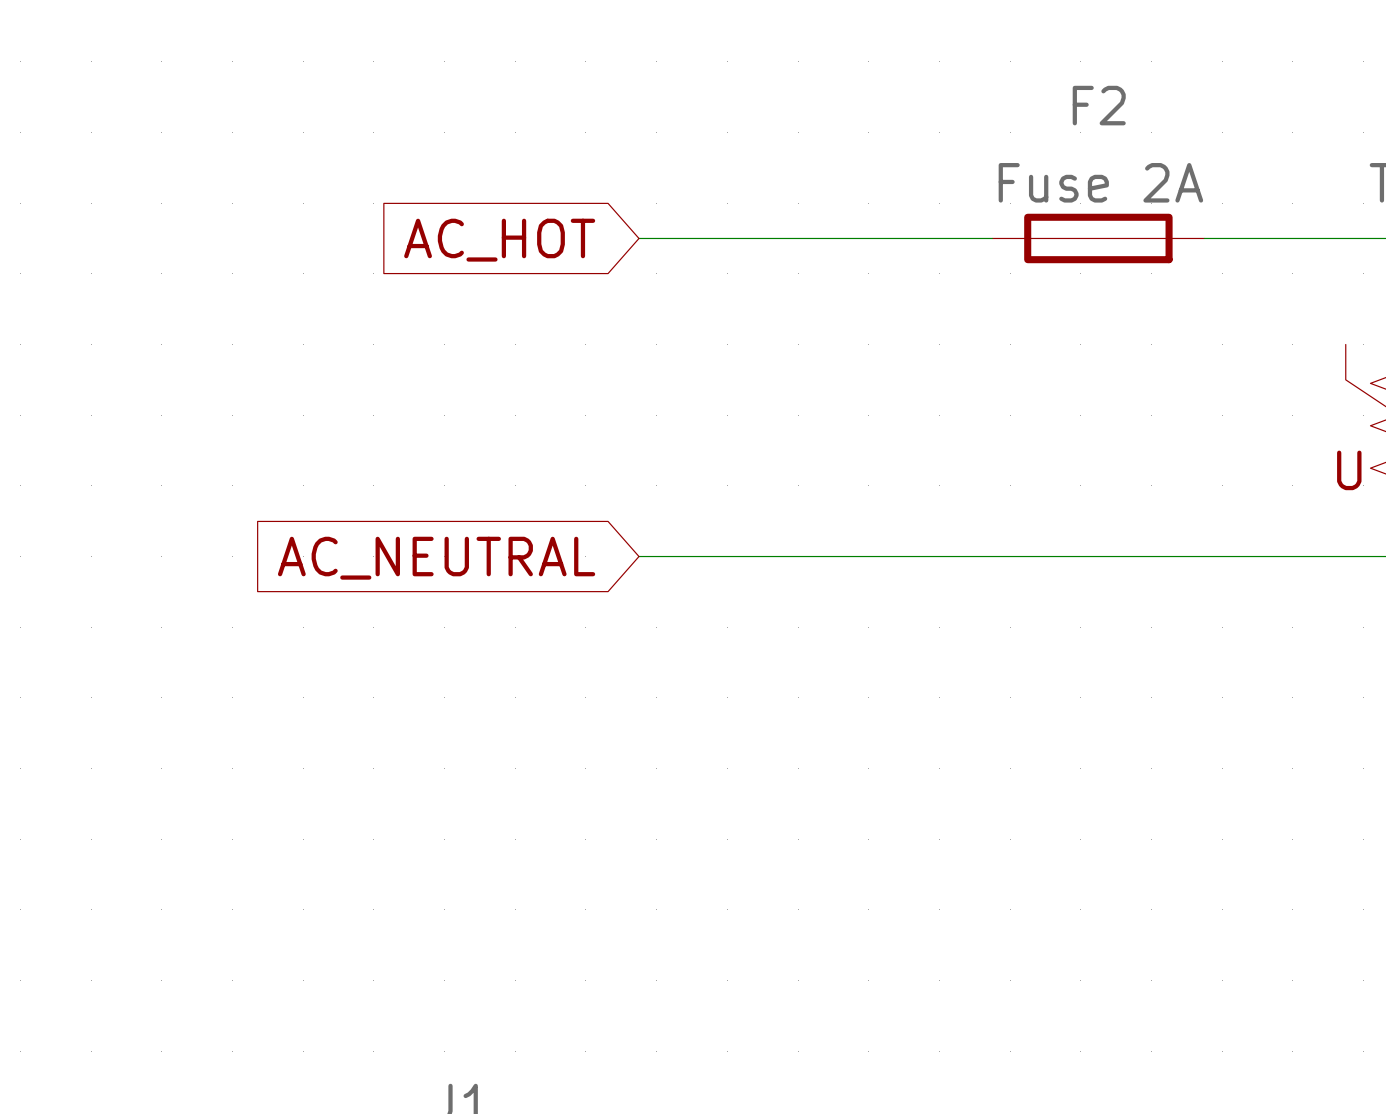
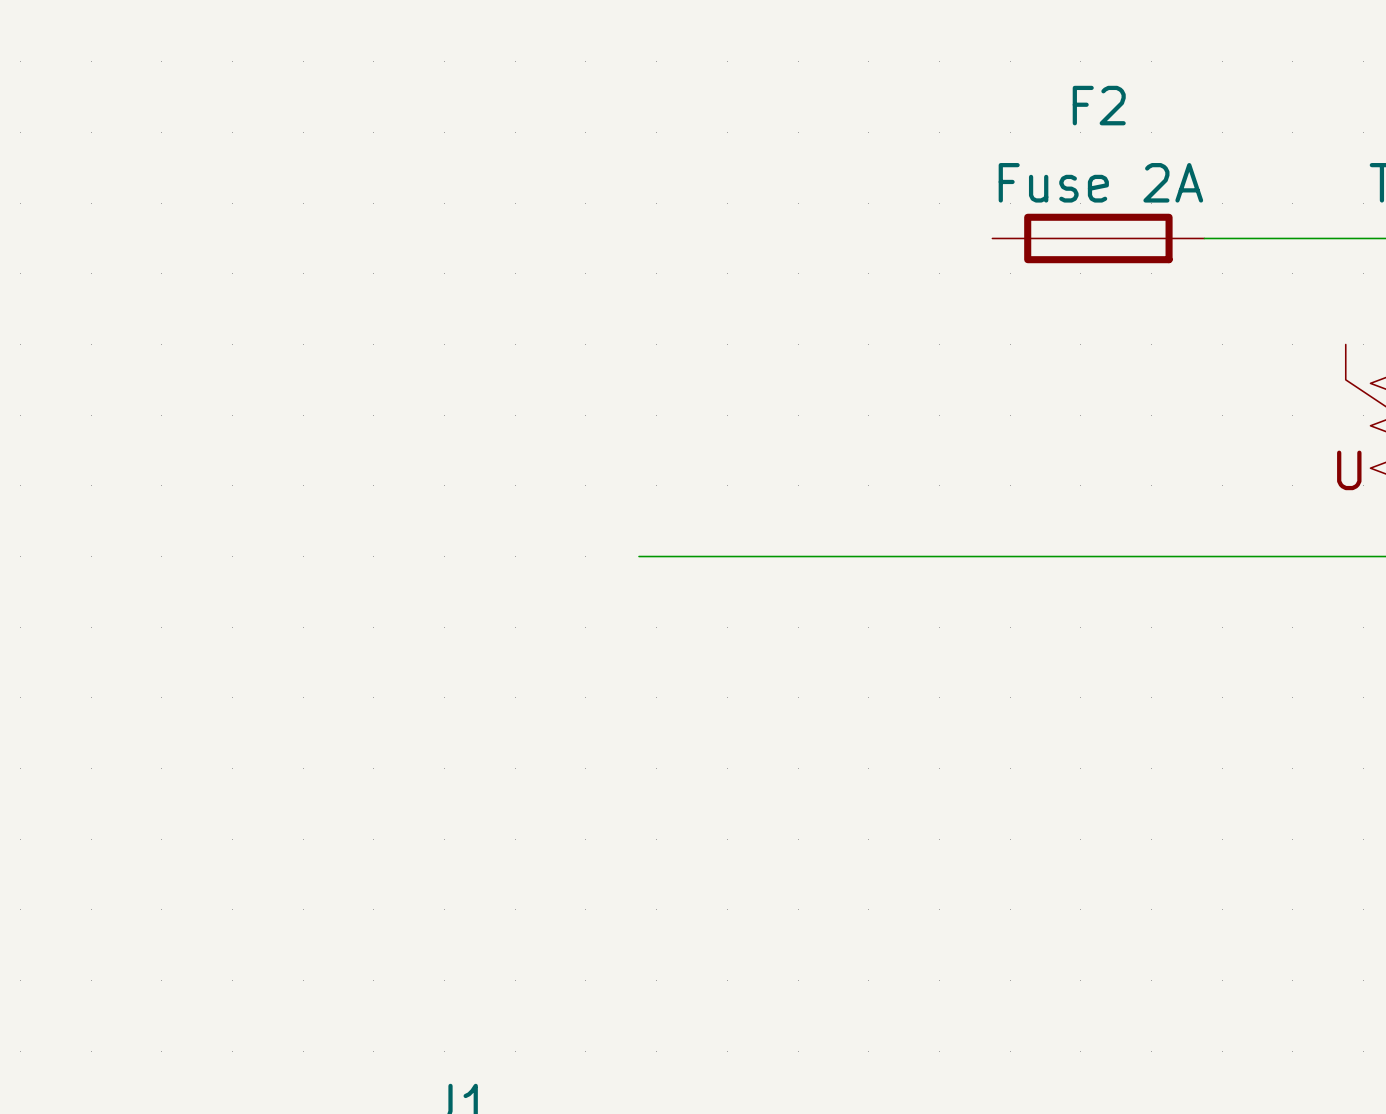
wire: (638, 238) (992, 238) -> none
global label: AC_HOT (499, 240) -> none
global label: AC_NEUTRAL (436, 558) -> none

